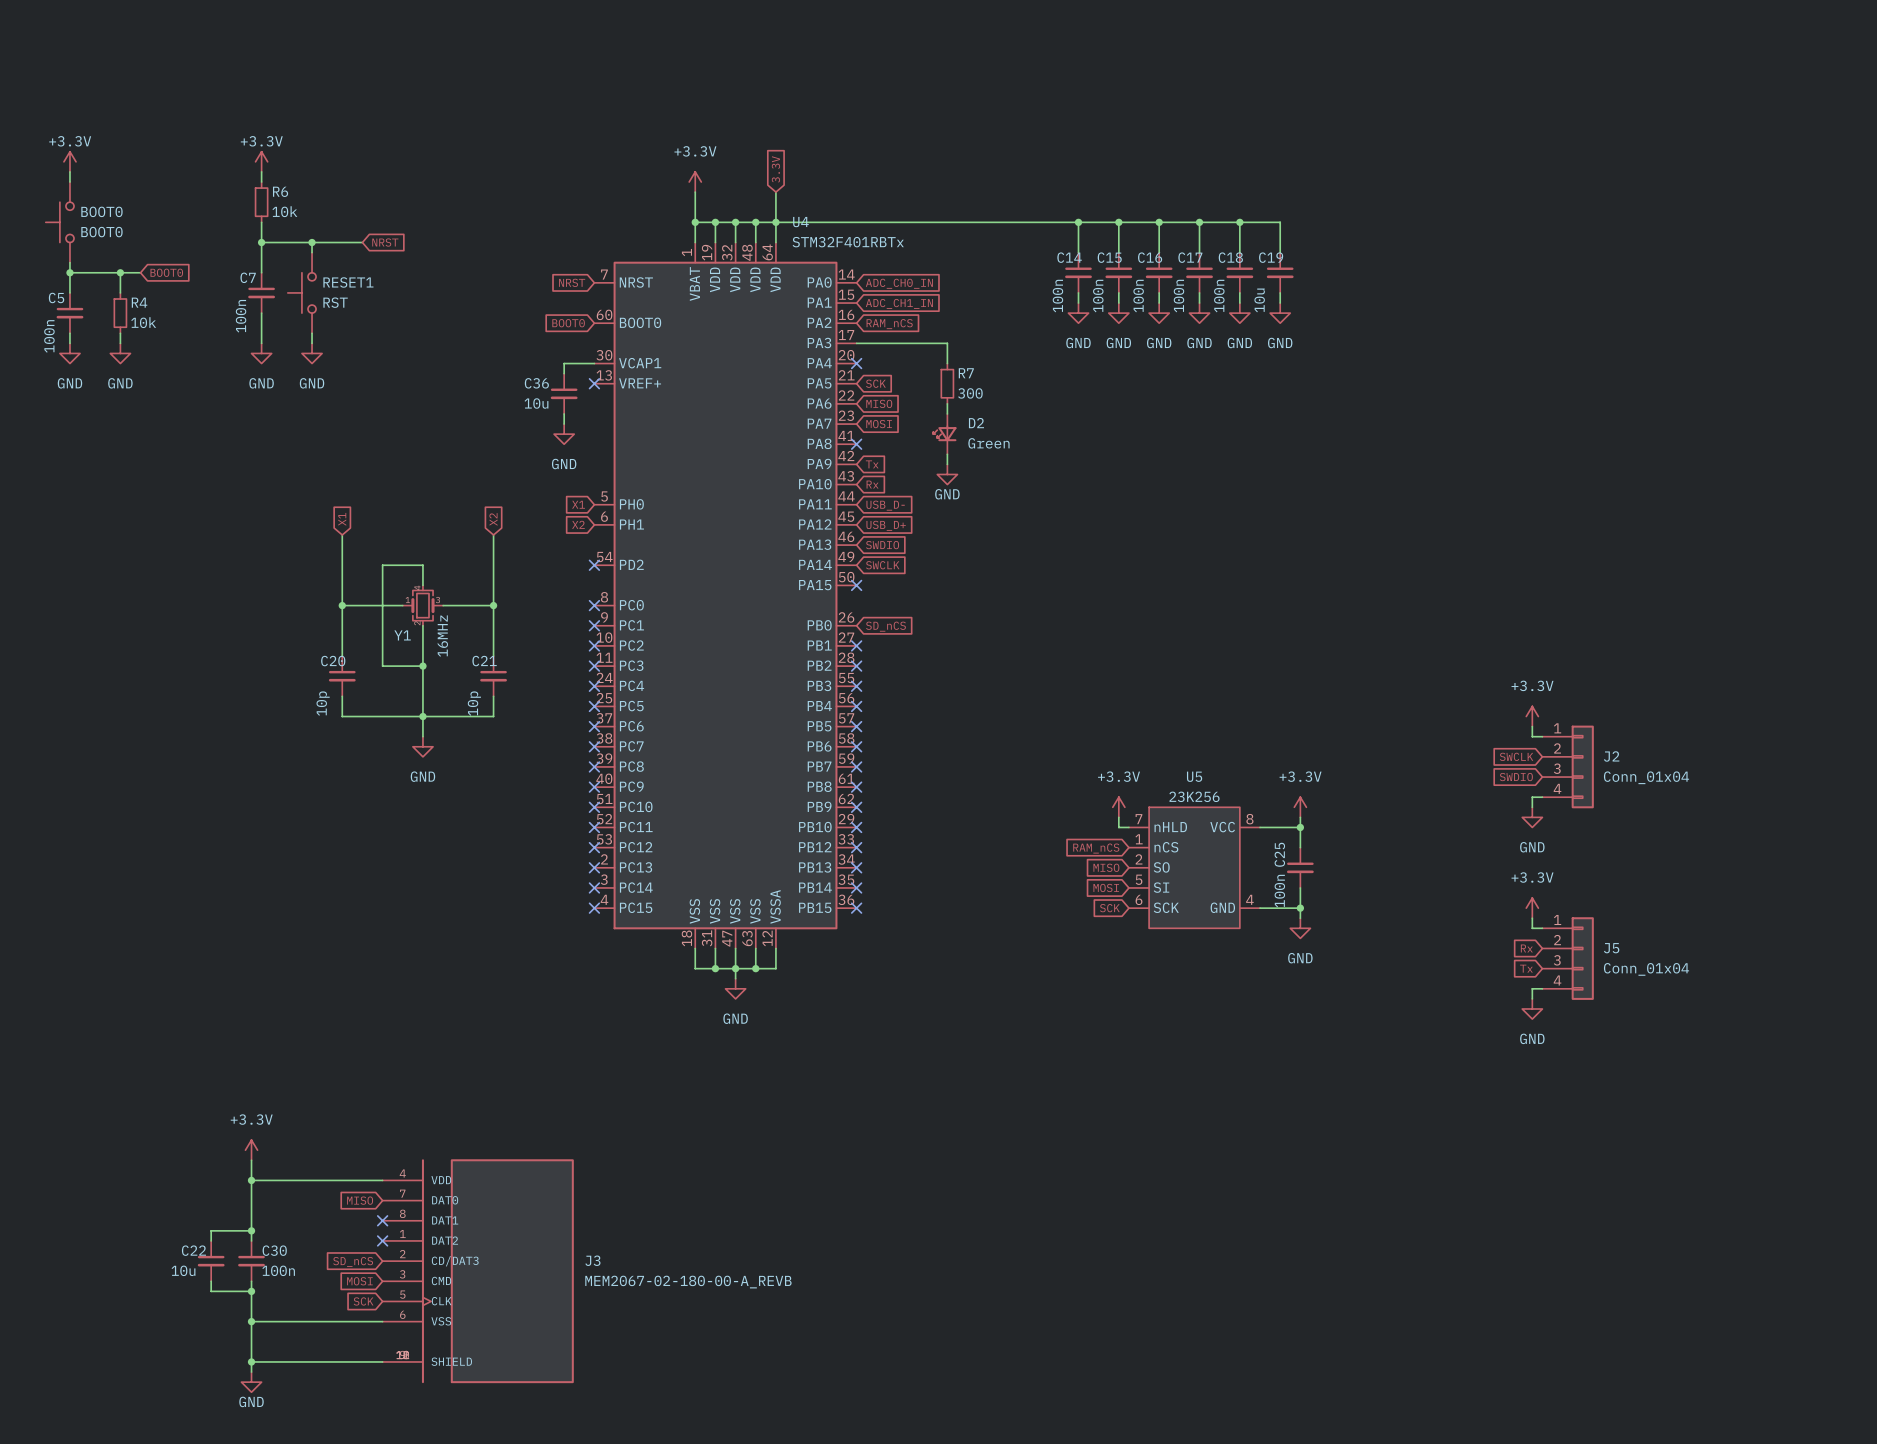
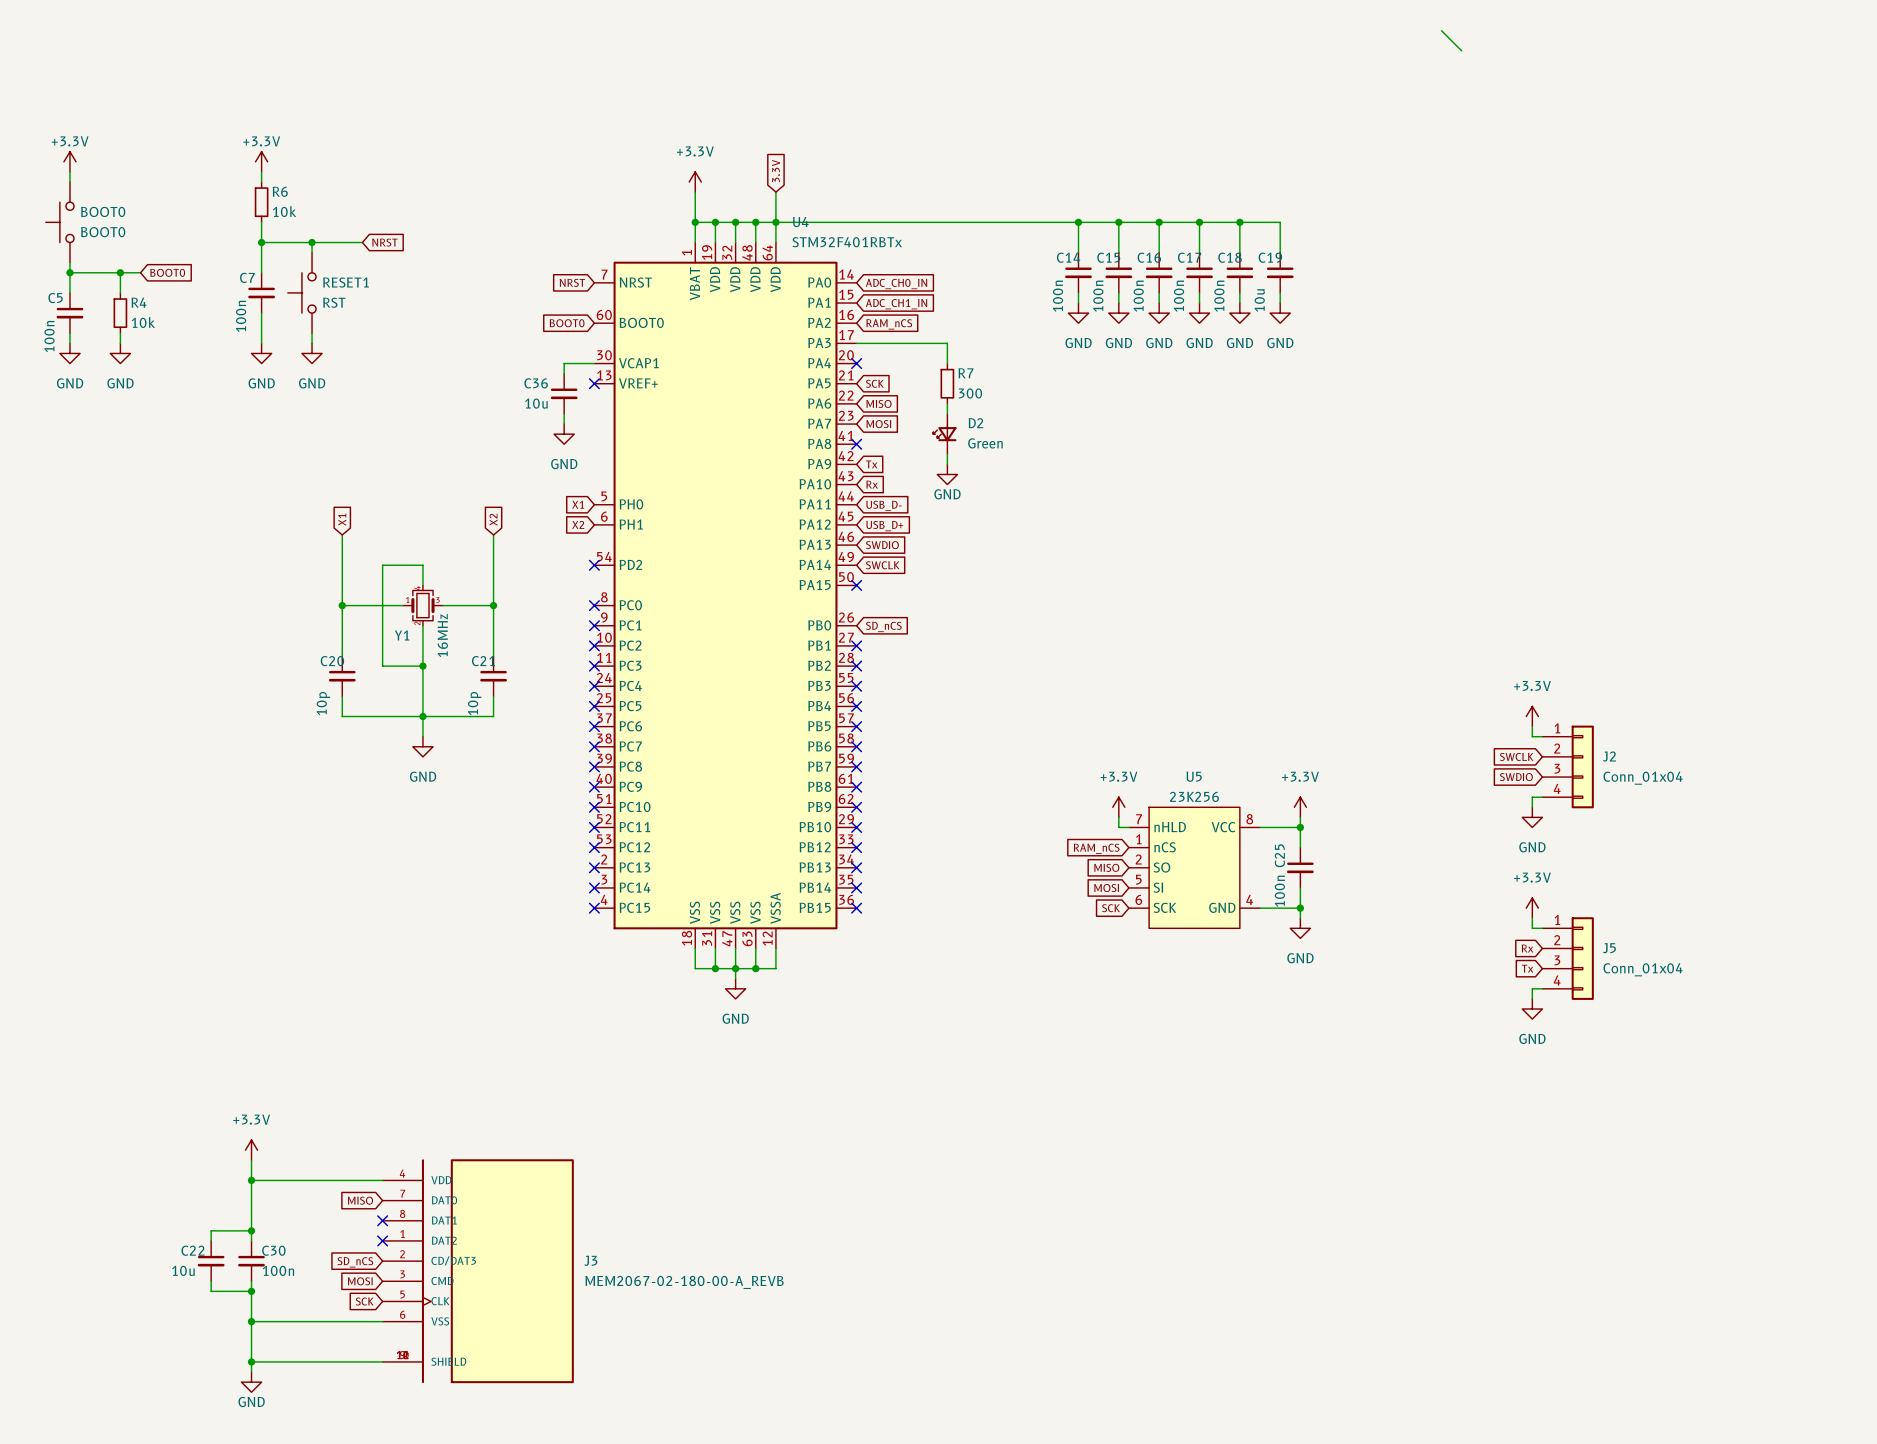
wire: none -> (1441, 30) (1461, 50)

